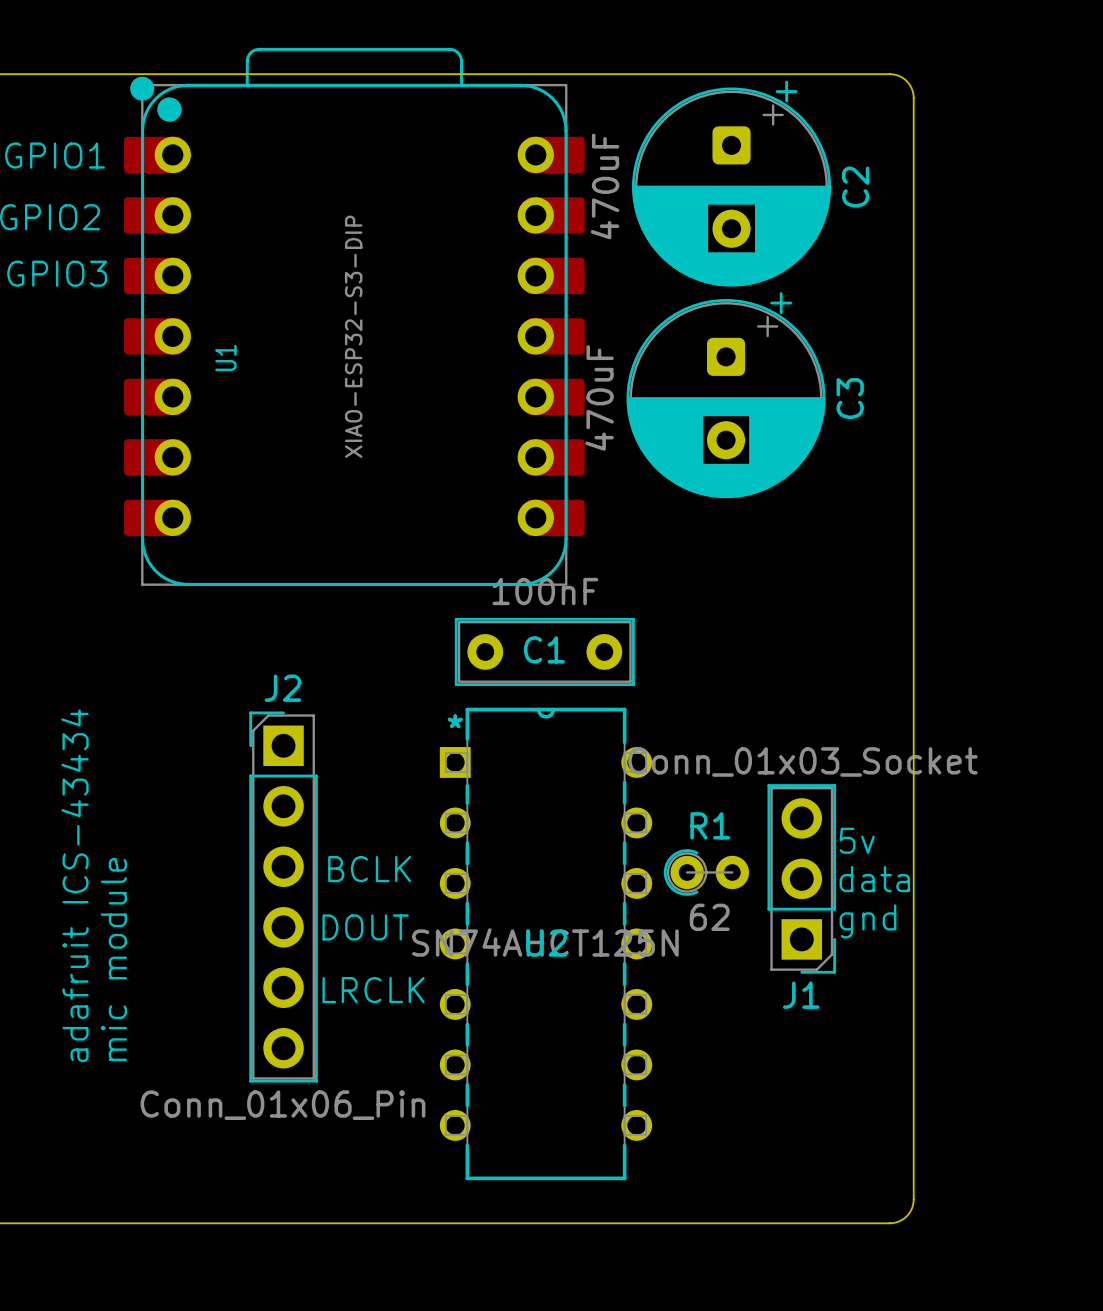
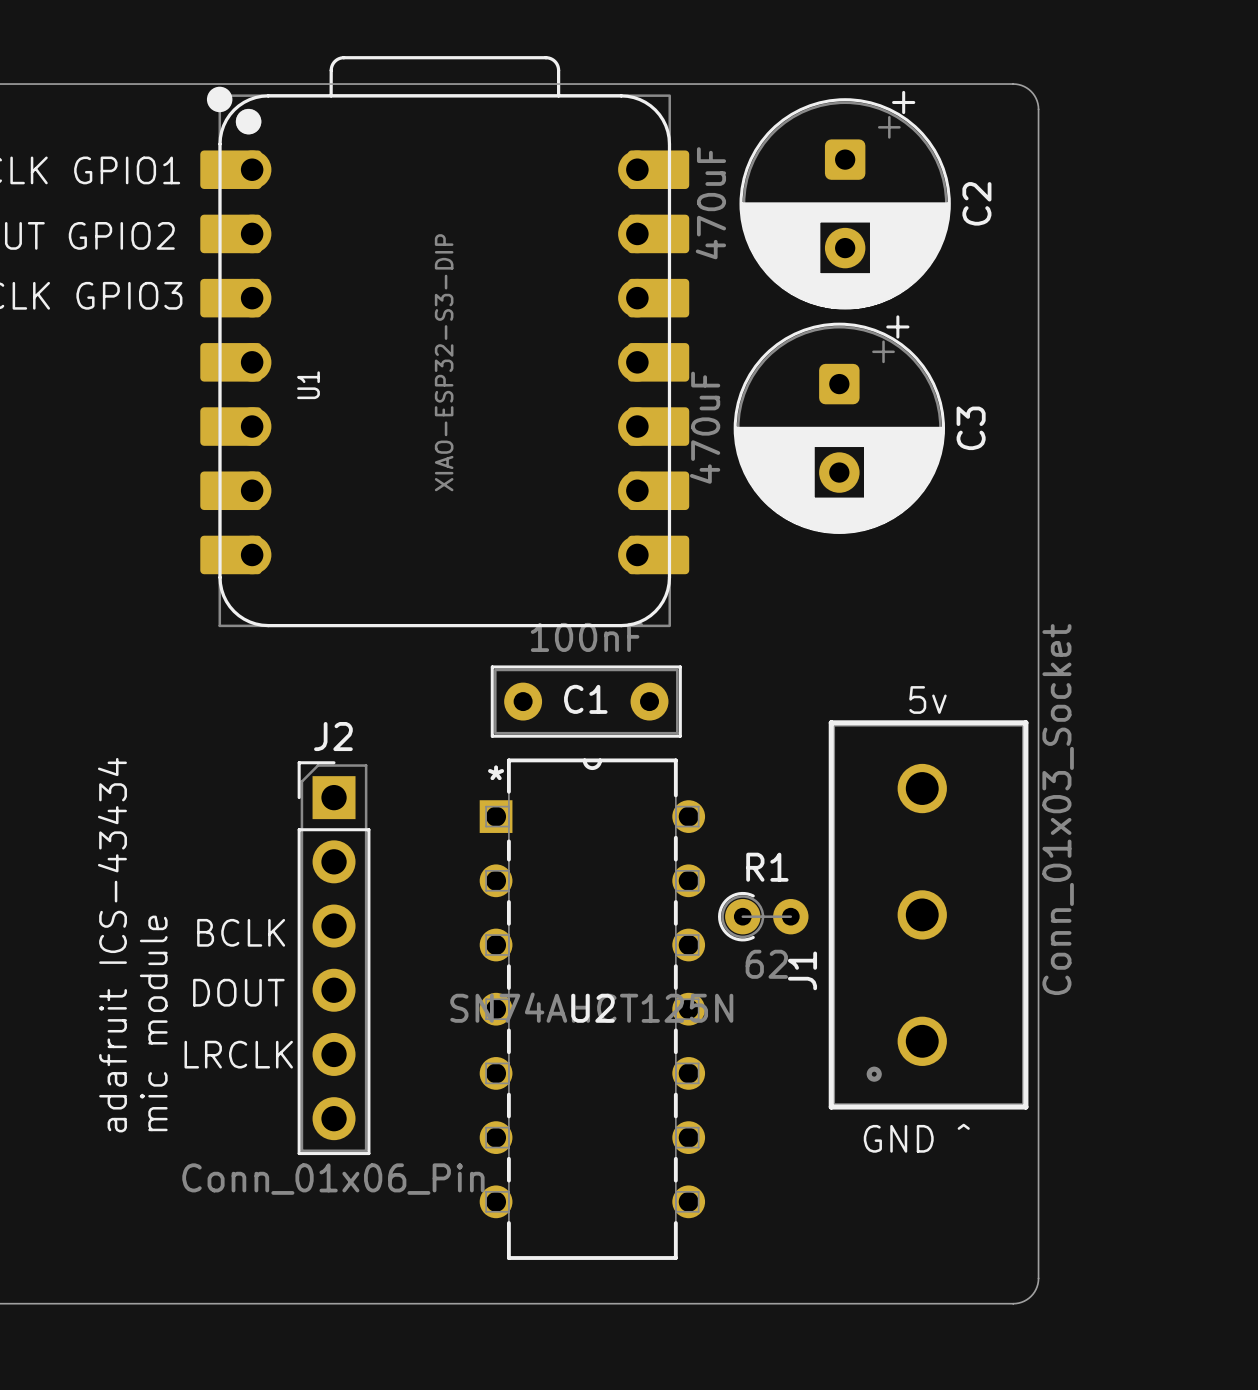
C1 position: (544, 651) -> (586, 701)
J1 value position: Conn_01x03_Socket (802, 761) -> Conn_01x03_Socket (1058, 809)
J1 footprint: [767, 784, 837, 974] -> [828, 720, 1029, 1110]
text position: 5v (857, 840) -> 5v (927, 700)
text position: BCLK (369, 869) -> BCLK (241, 932)
R1 position: (706, 872) -> (763, 916)
text: data (874, 879) -> none
text position: adafruit ICS-43434 (75, 885) -> adafruit ICS-43434 (112, 945)
J2 position: (283, 897) -> (334, 958)
text: gnd (867, 921) -> none
text position: DOUT (365, 927) -> DOUT (238, 992)
U2 position: (545, 943) -> (592, 1009)
text position: mic module (113, 959) -> mic module (153, 1023)
text position: LRCLK (373, 990) -> LRCLK (238, 1054)
J1 name position: J1 (801, 995) -> J1 (802, 970)
text: none -> GND ^ (916, 1138)

